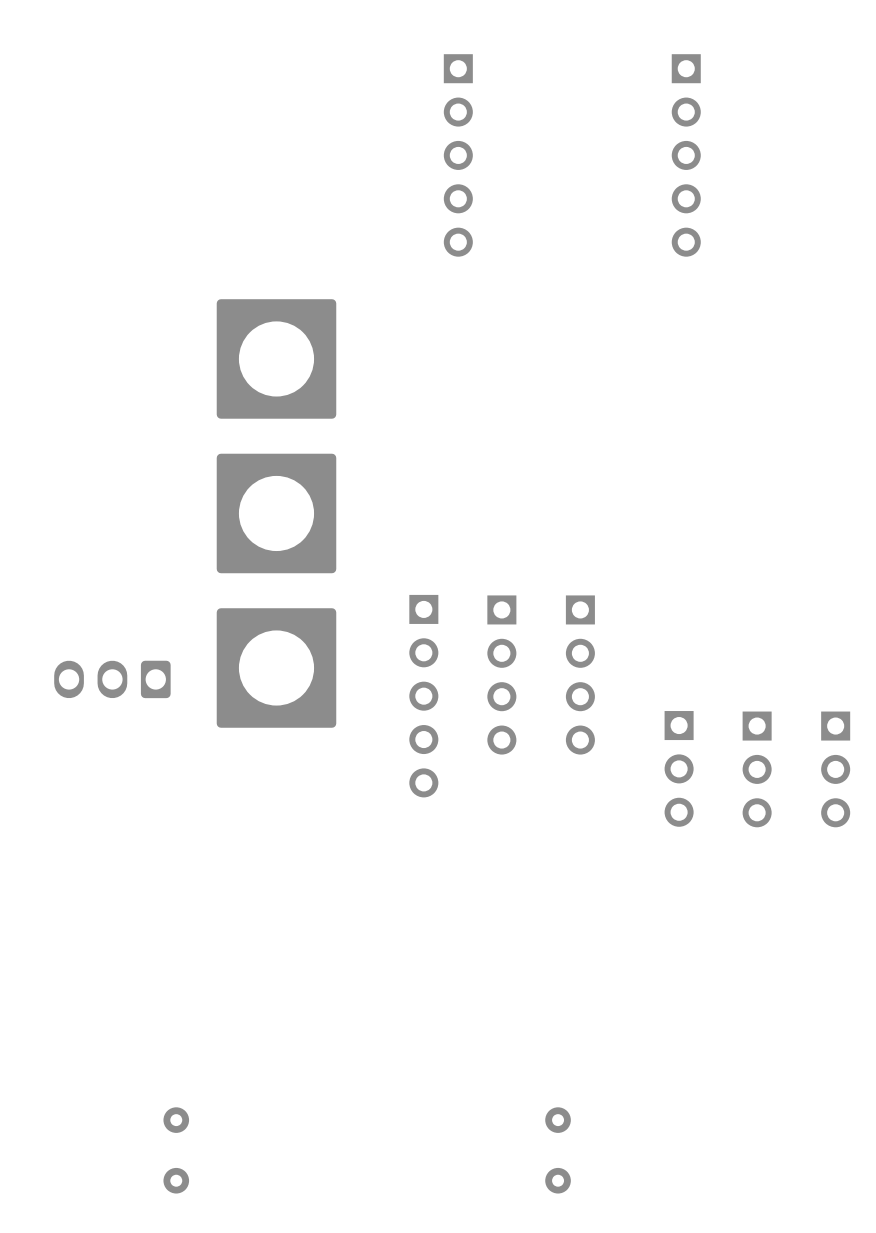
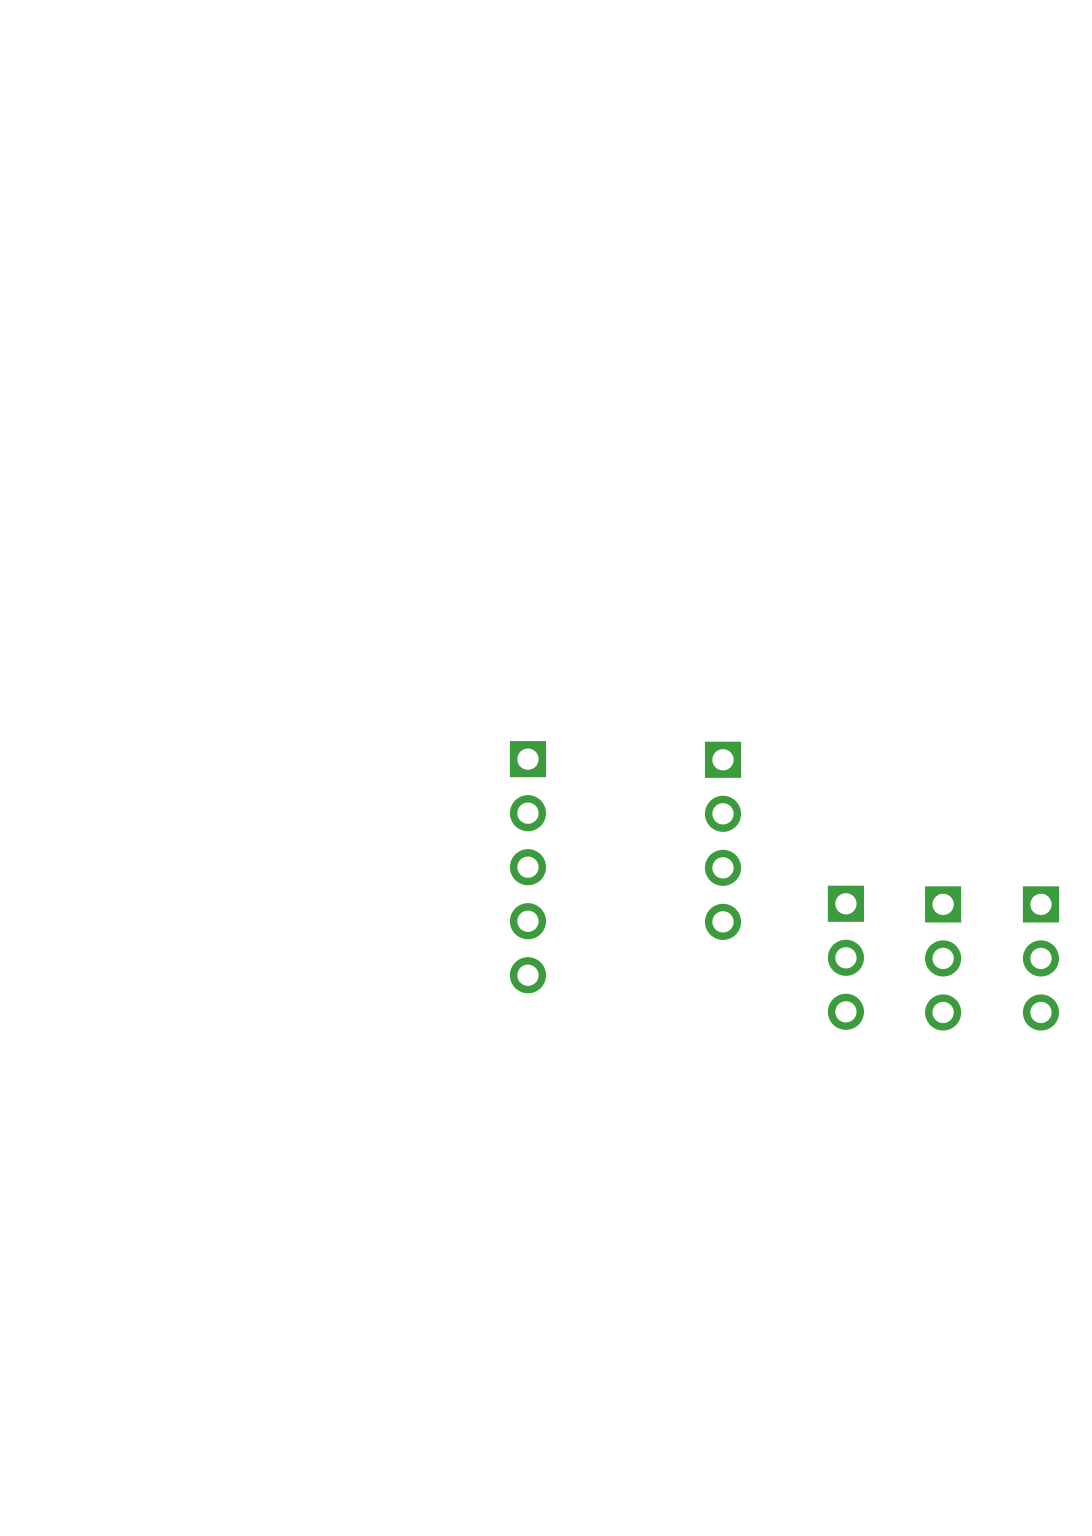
part: (458, 155) -> none
part: (686, 155) -> none
part: (276, 358) -> none
part: (276, 513) -> none
part: (276, 667) -> none
part: (501, 674) -> none
part: (112, 679) -> none
part: (176, 1120) -> none
part: (558, 1120) -> none
part: (176, 1180) -> none
part: (558, 1180) -> none

